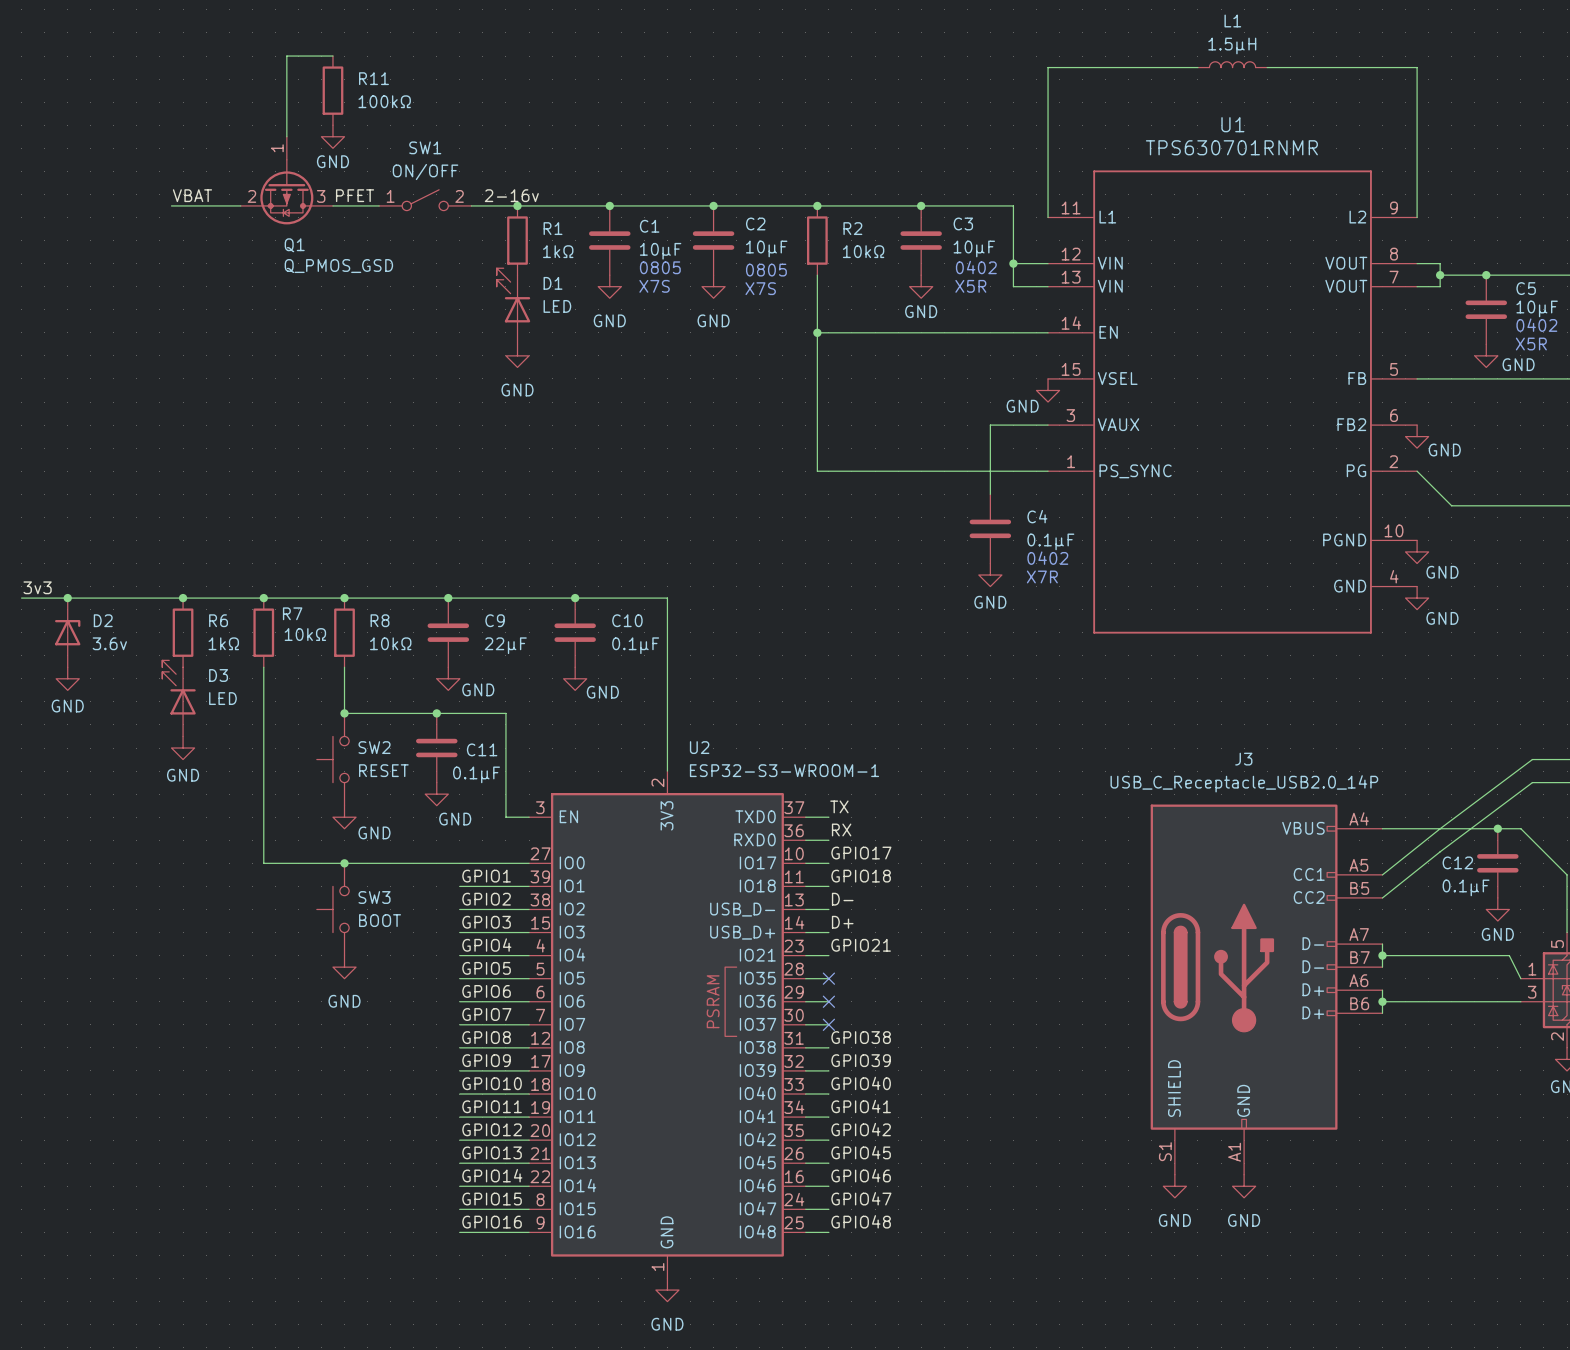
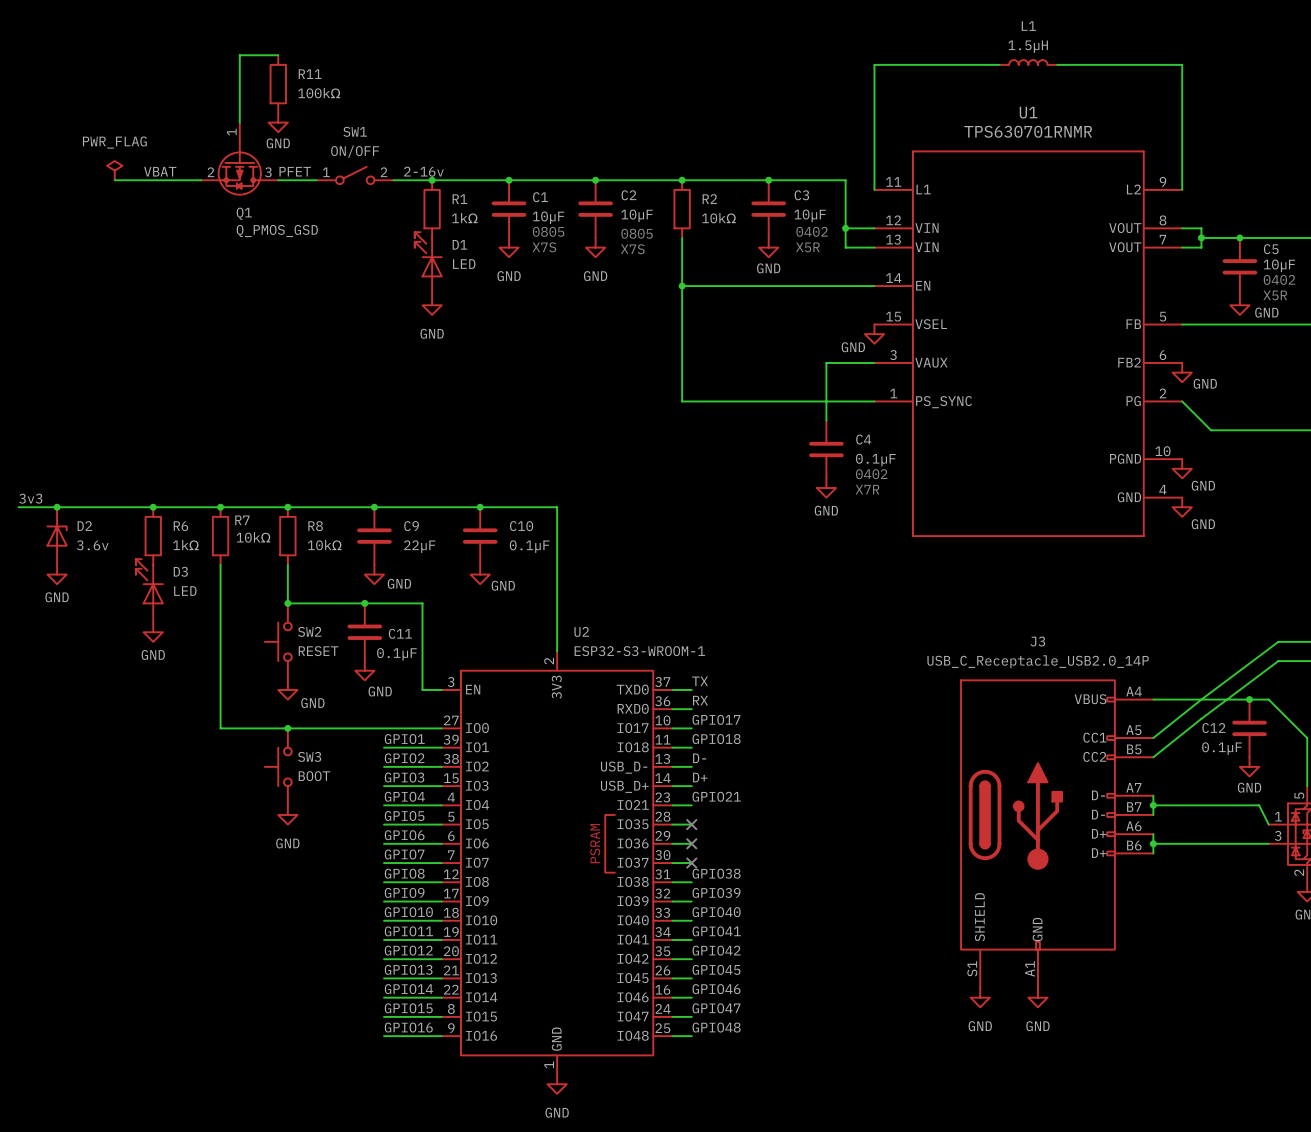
power symbol: none -> PWR_FLAG (114, 170)
wire: none -> (114, 180) (143, 180)

